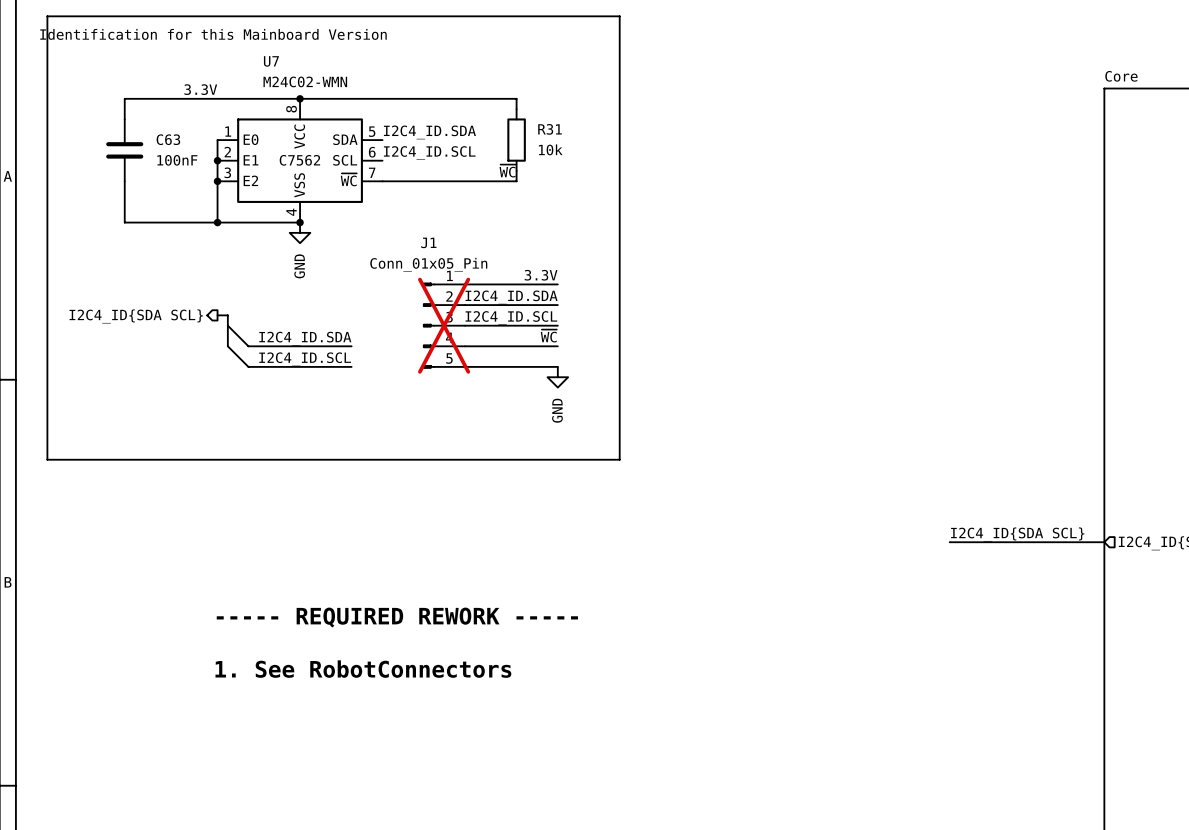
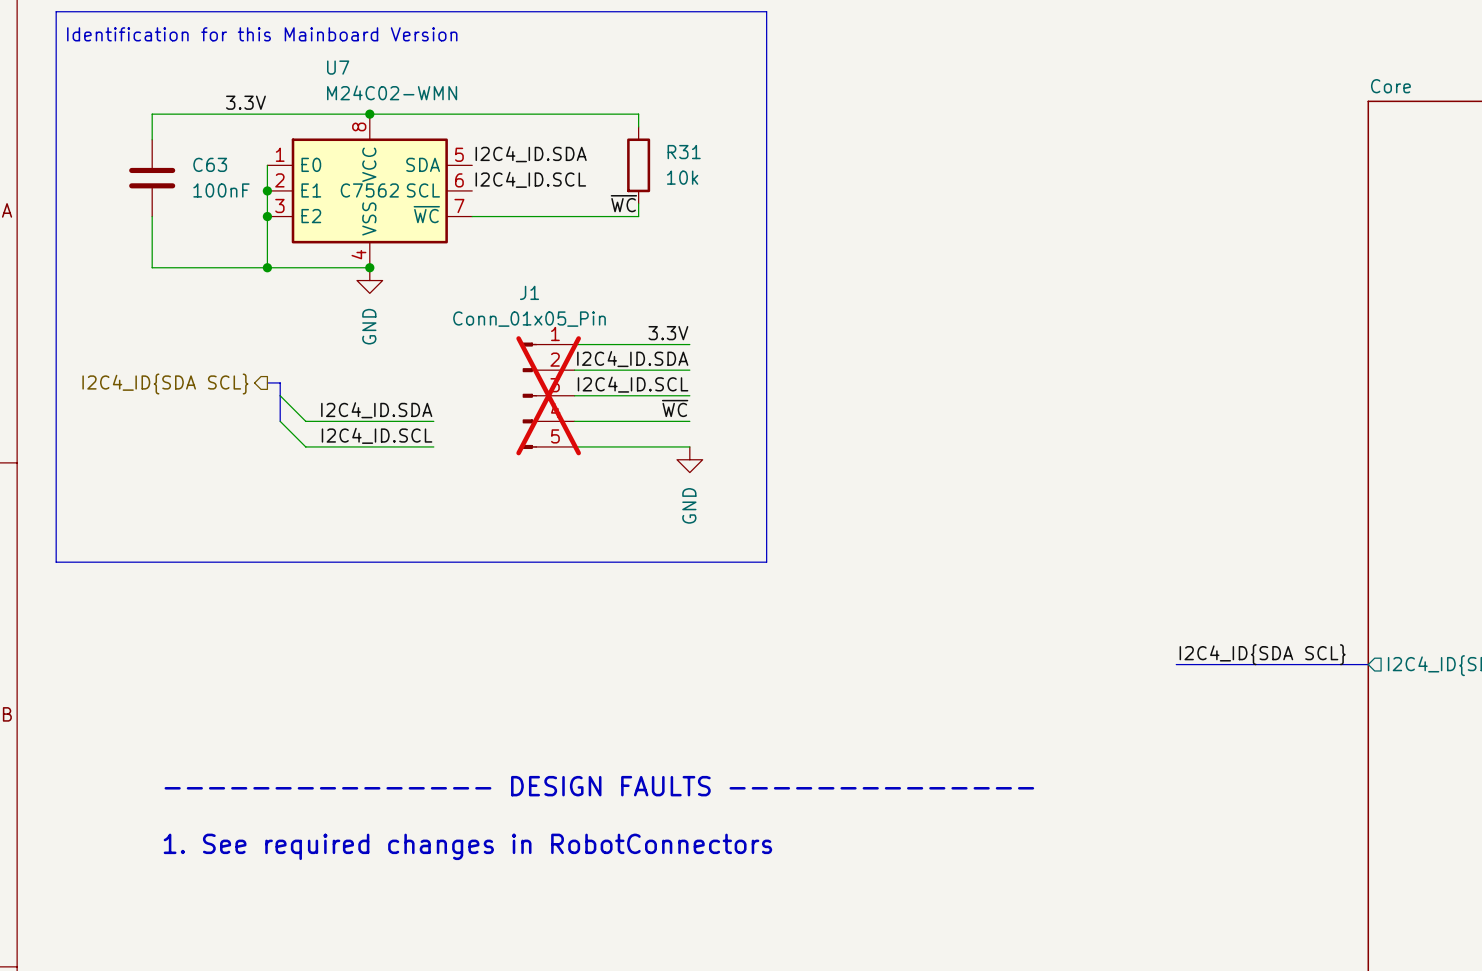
text: ----- REQUIRED REWORK ----- (397, 617) -> none
text: none -> --------------- DESIGN FAULTS -------------- (599, 786)
text: 1. See RobotConnectors (363, 669) -> 1. See required changes in RobotConnectors (467, 846)

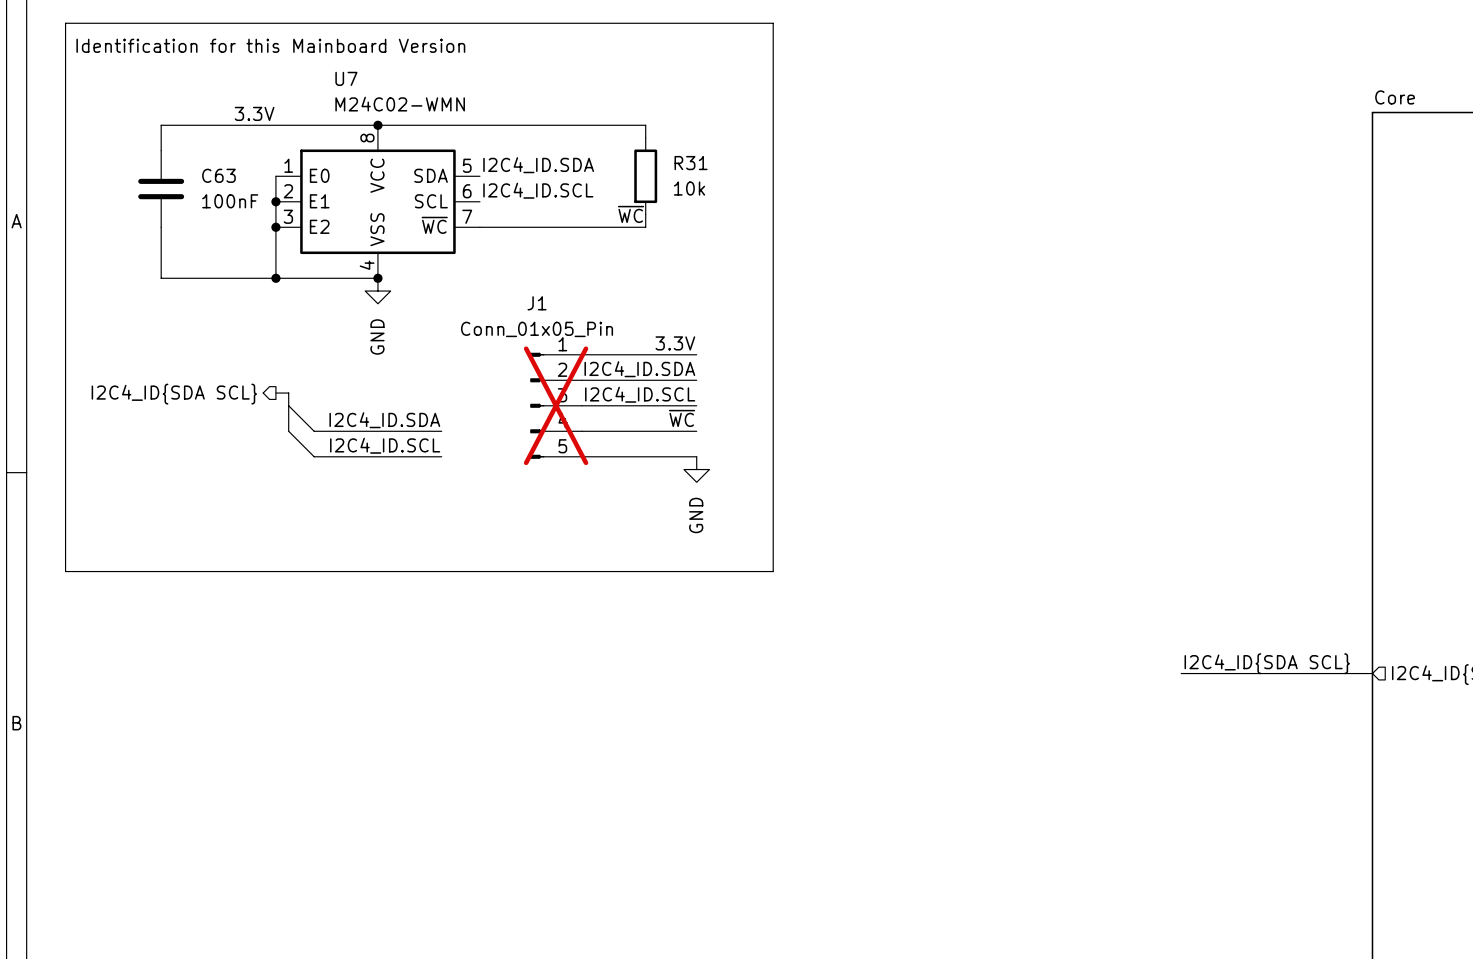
U7 text: C7562 (369, 190) -> none
text: --------------- DESIGN FAULTS -------------- (599, 786) -> none
text: 1. See required changes in RobotConnectors (467, 846) -> none

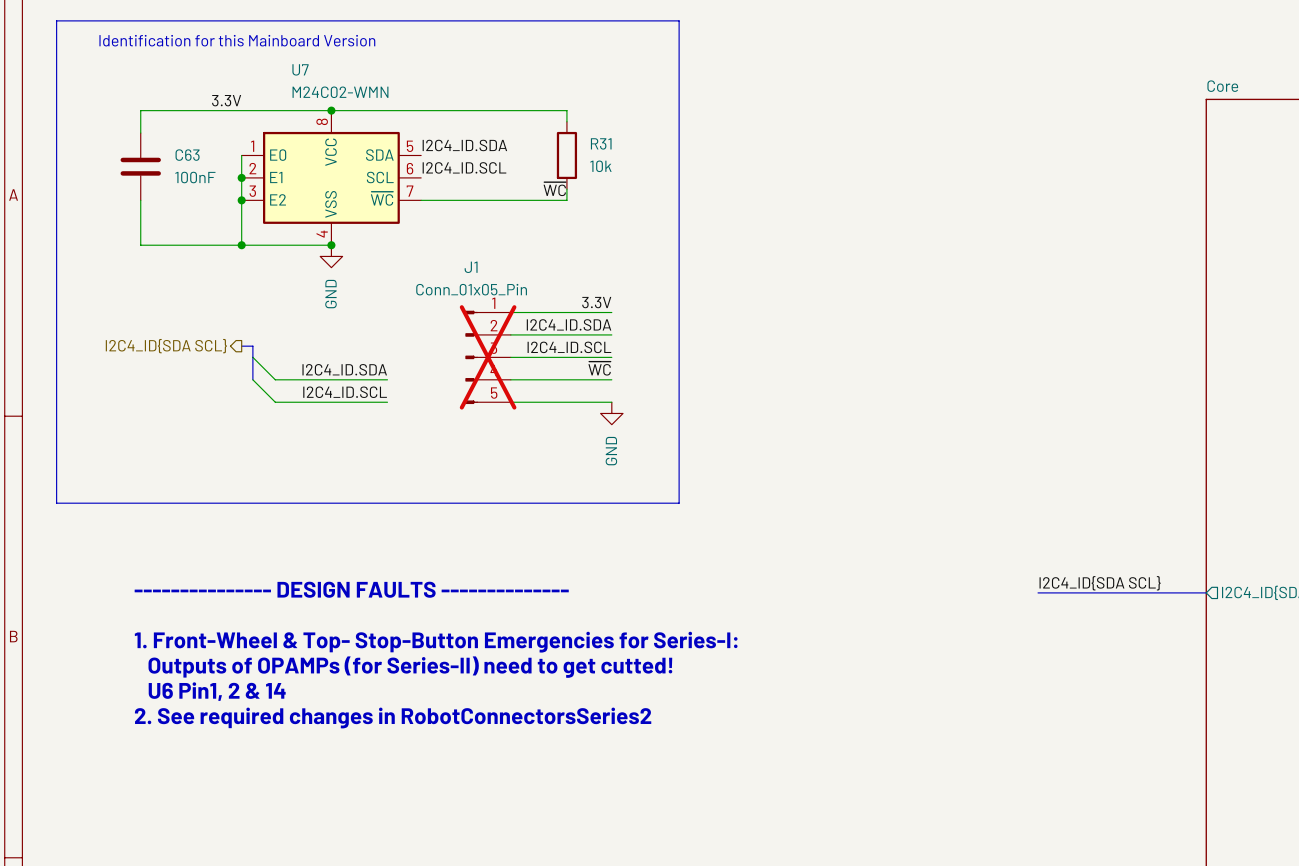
text: none -> --------------- DESIGN FAULTS -------------- (351, 589)
text: none -> 1. Front-Wheel & Top- Stop-Button Emergencies for Series-I: (436, 642)
text: none -> Outputs of OPAMPs (for Series-II) need to get cutted! (410, 667)
text: none -> U6 Pin1, 2 & 14 (217, 691)
text: none -> 2. See required changes in RobotConnectorsSeries2 (393, 718)

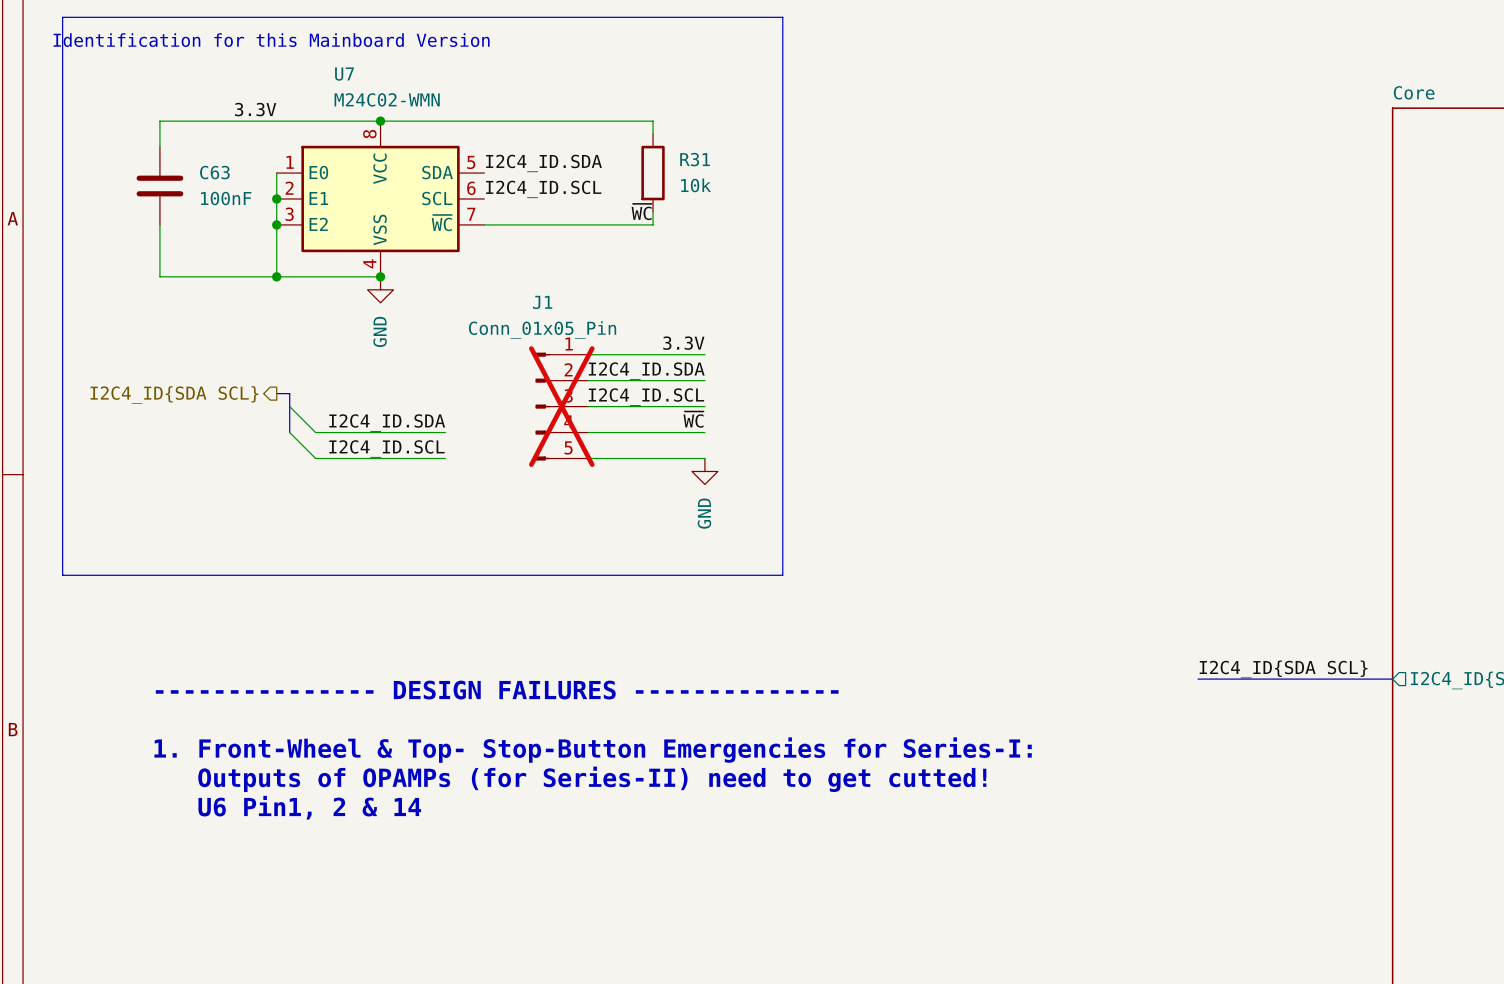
text: --------------- DESIGN FAULTS -------------- (351, 589) -> --------------- DESIGN FAILURES -------------- (497, 690)
text position: 1. Front-Wheel & Top- Stop-Button Emergencies for Series-I: (436, 642) -> 1. Front-Wheel & Top- Stop-Button Emergencies for Series-I: (593, 750)
text position: Outputs of OPAMPs (for Series-II) need to get cutted! (410, 667) -> Outputs of OPAMPs (for Series-II) need to get cutted! (592, 779)
text position: U6 Pin1, 2 & 14 (217, 691) -> U6 Pin1, 2 & 14 (309, 807)
text: 2. See required changes in RobotConnectorsSeries2 (393, 718) -> none

